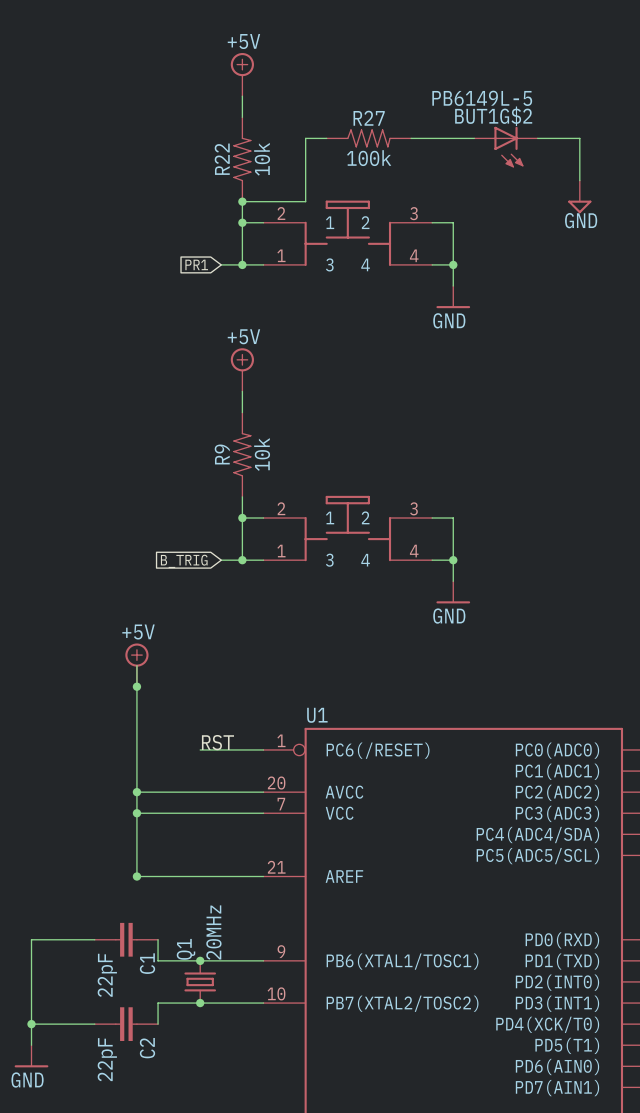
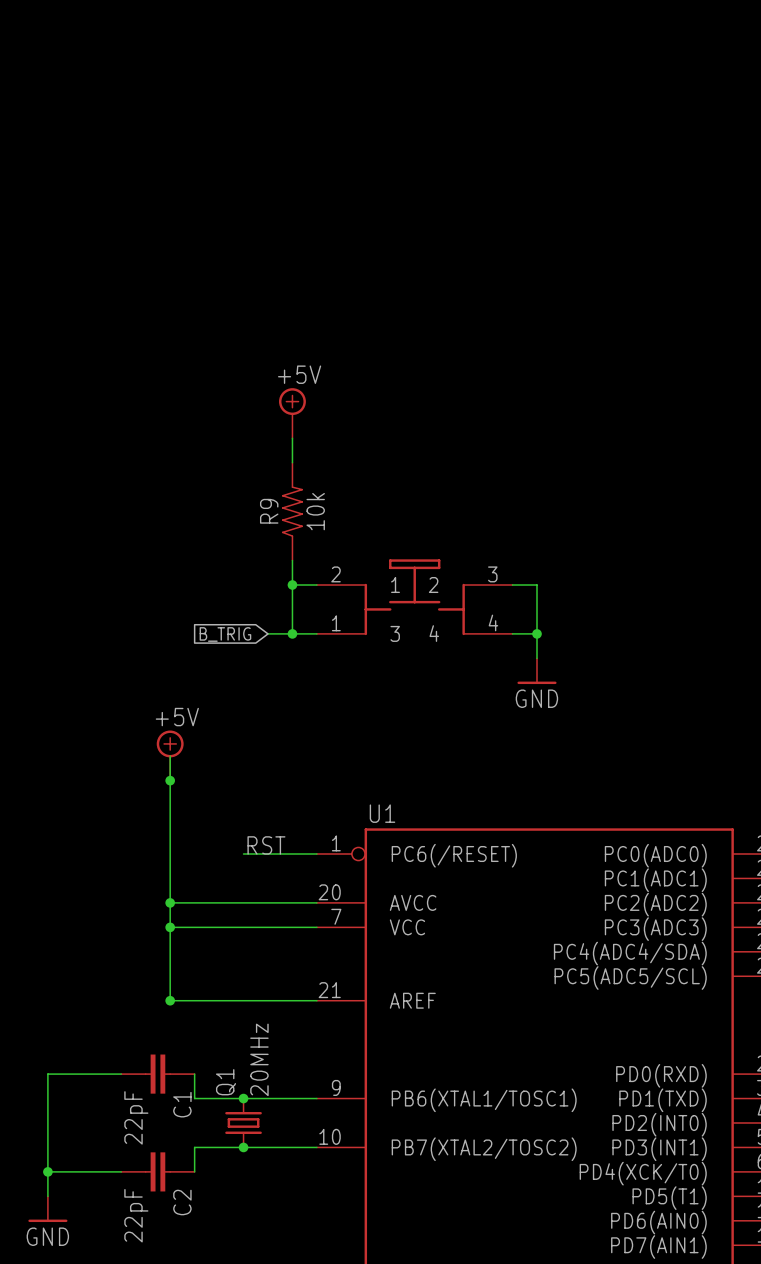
power symbol: +5V (242, 74) -> none
wire: (242, 96) (242, 117) -> none
wire: (326, 138) (305, 138) (305, 201) (242, 201) (242, 264) -> none
R27: 100k (368, 138) -> none
wire: (411, 138) (474, 138) -> none
wire: (537, 138) (579, 138) (579, 180) -> none
BUT1G$2: PB6149L-5 (506, 147) -> none
R22: 10k (242, 159) -> none
power symbol: GND (579, 196) -> none
junction: (242, 201) -> none
wire: (242, 222) (263, 222) -> none
junction: (242, 222) -> none
wire: (432, 222) (453, 222) (453, 286) -> none
part: (347, 233) -> none
global label: PR1 (196, 264) -> none
wire: (221, 264) (263, 264) -> none
junction: (242, 264) -> none
wire: (432, 264) (453, 264) -> none
junction: (453, 264) -> none
power symbol: GND (453, 297) -> none

